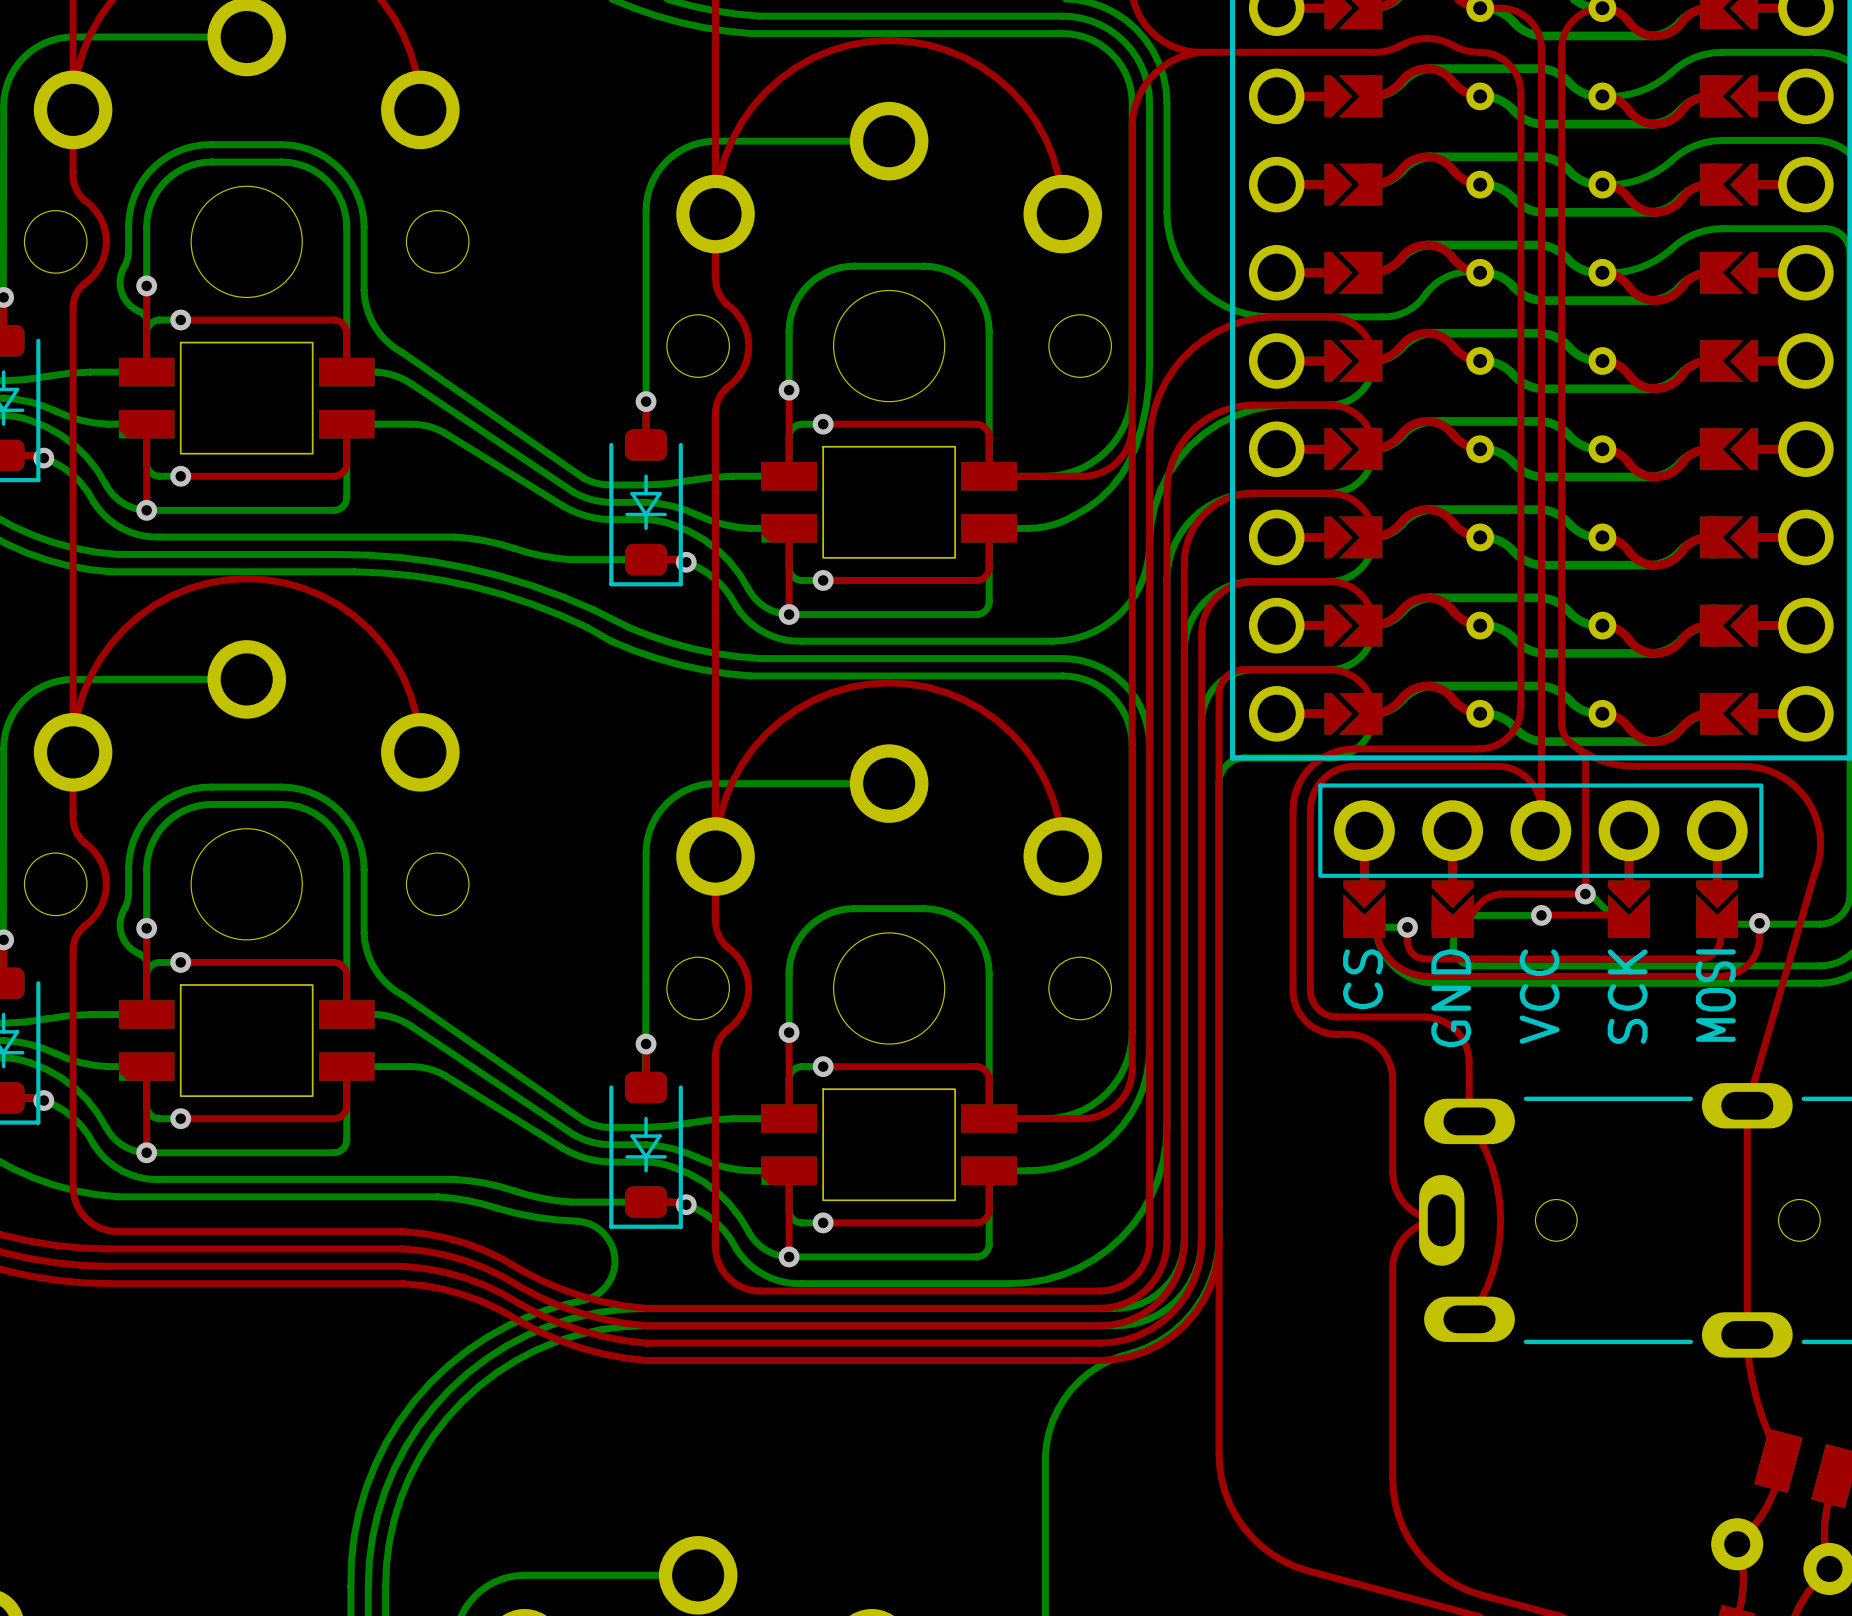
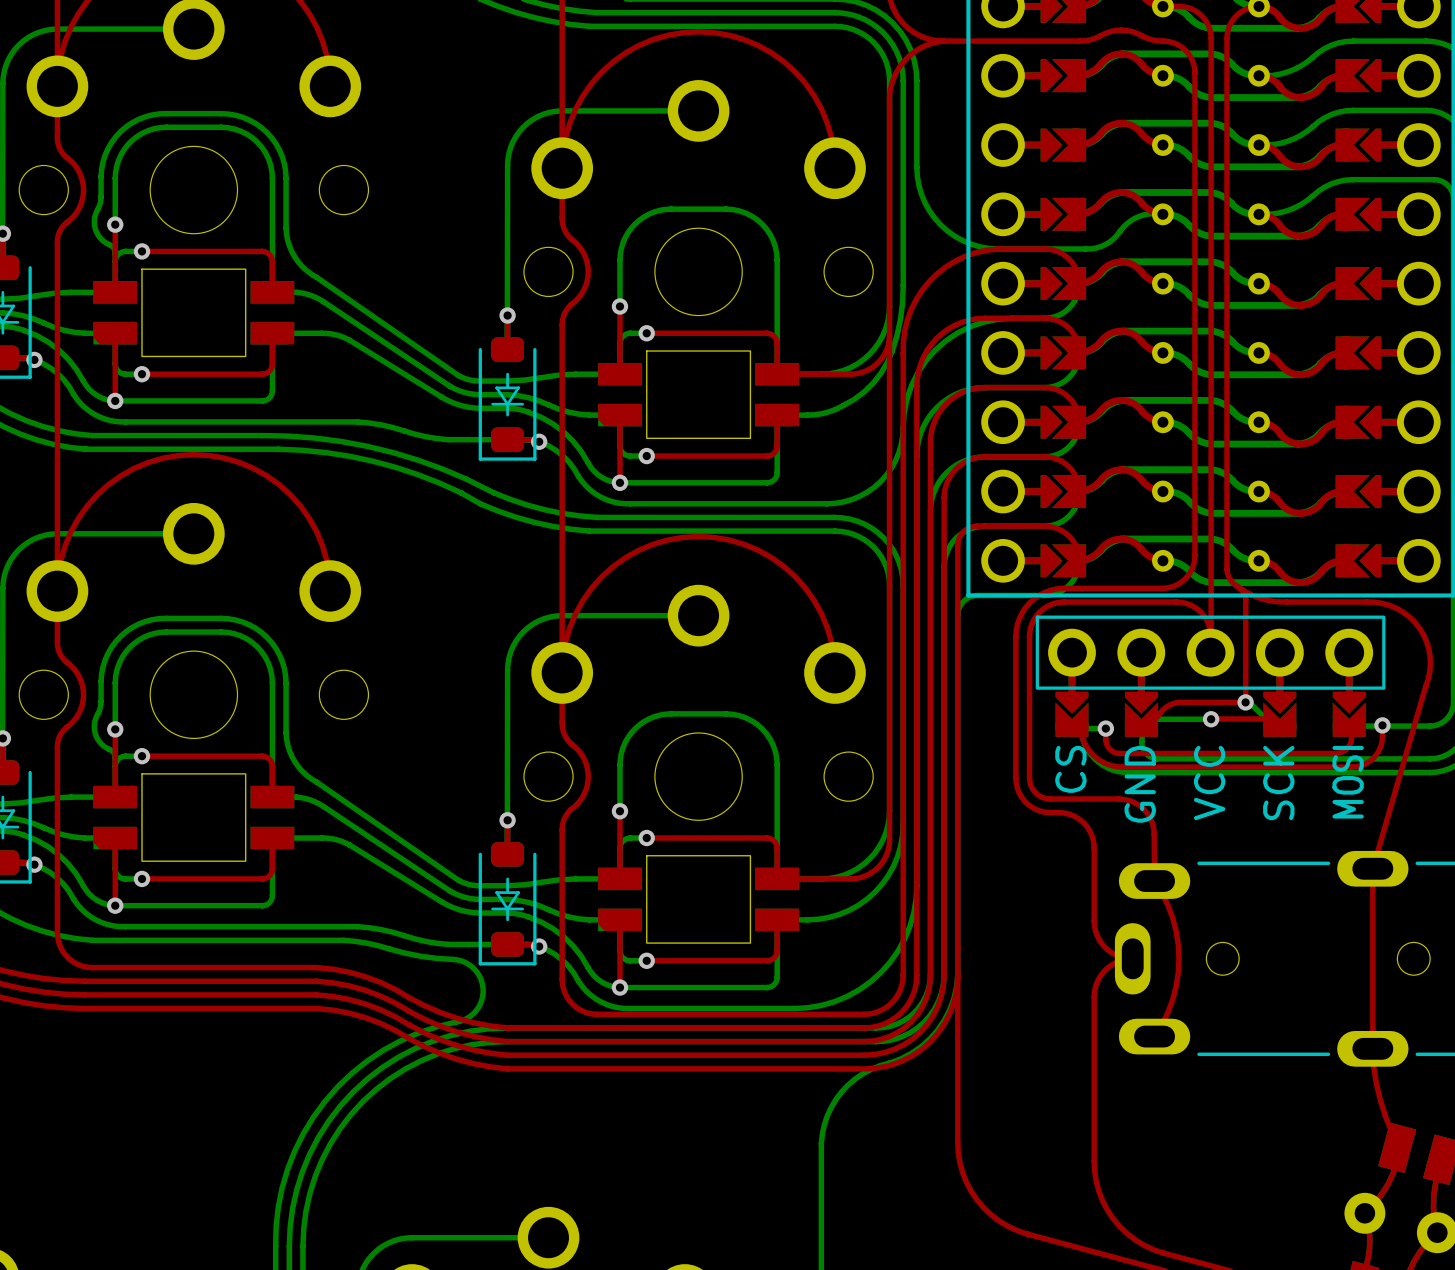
bottom track: (646, 210) (646, 401) -> (507, 165) (507, 349)

